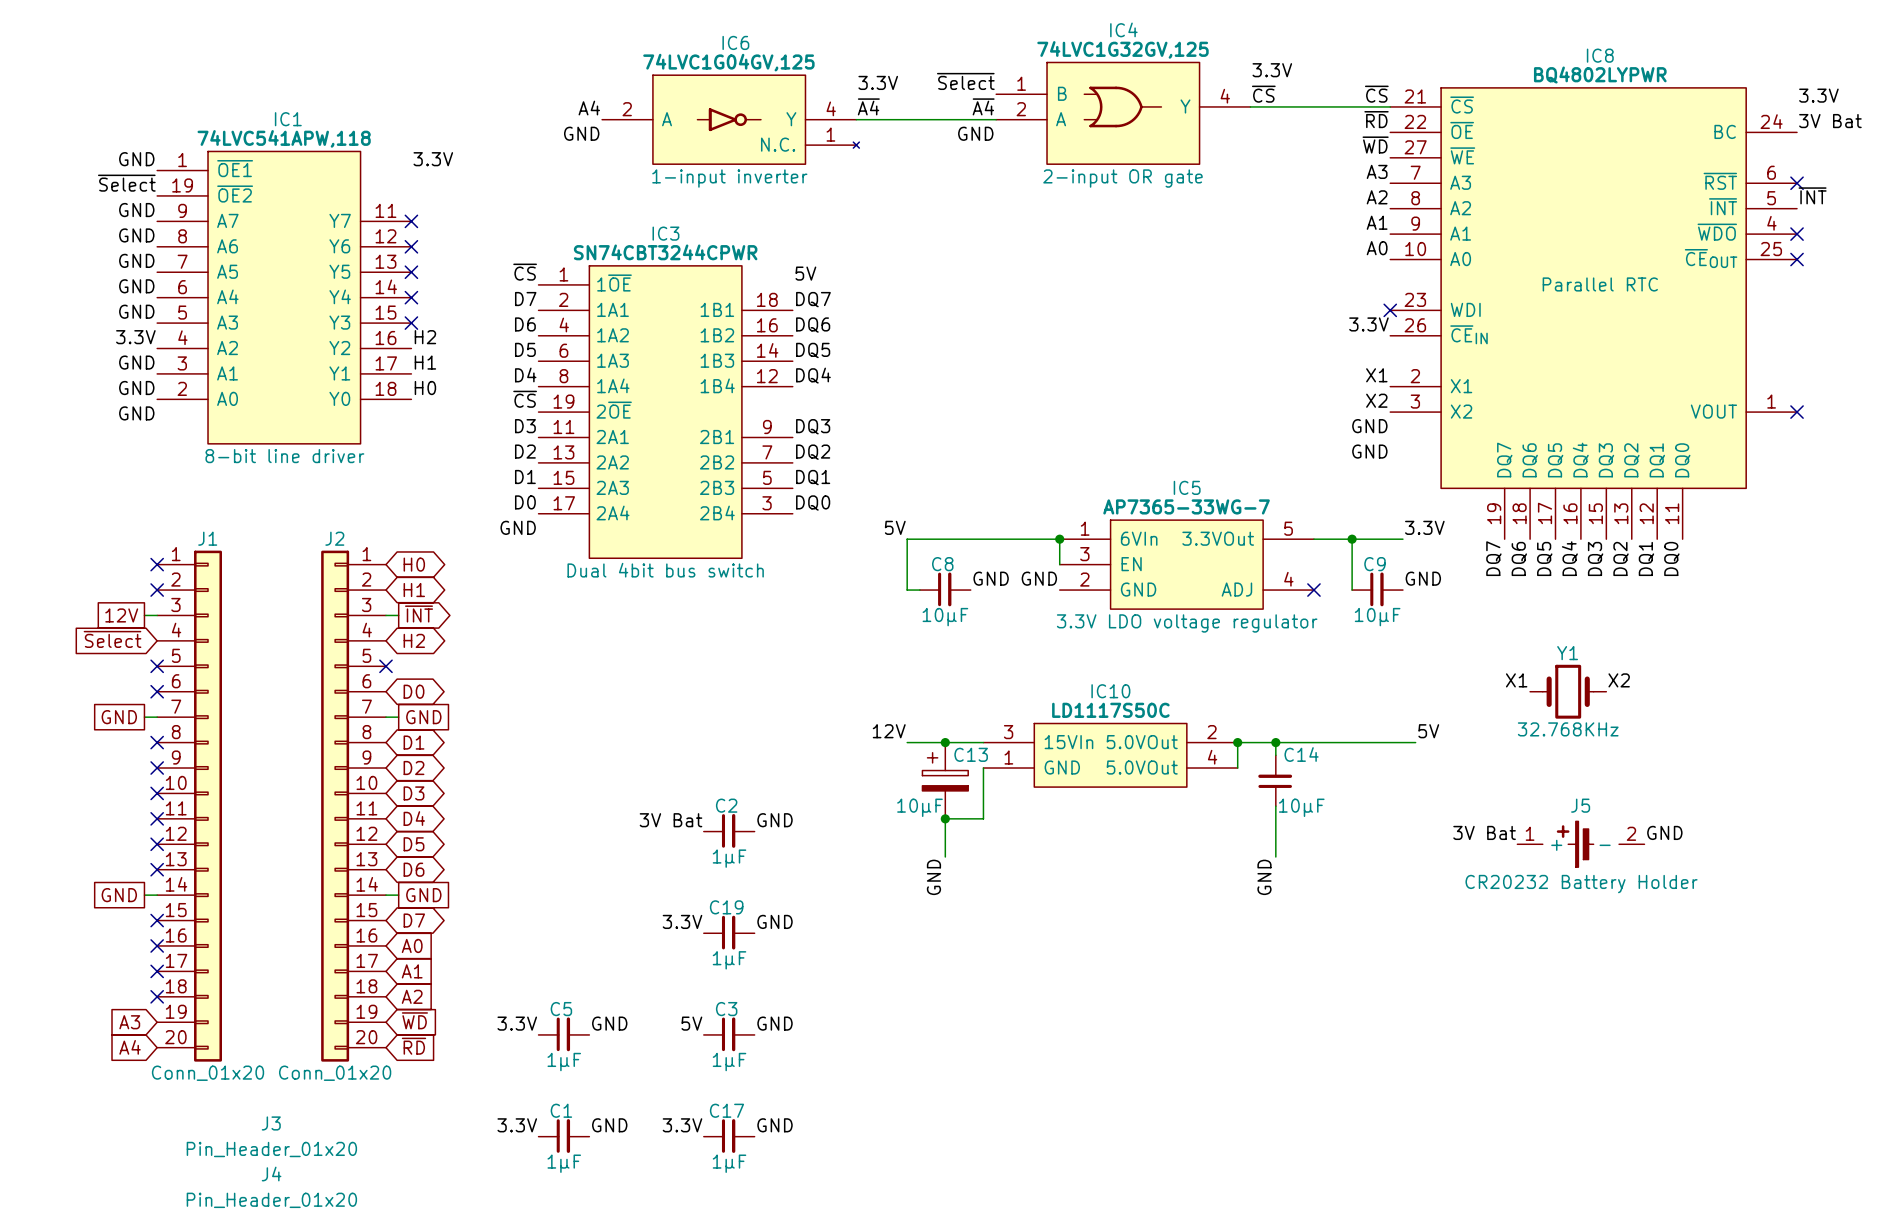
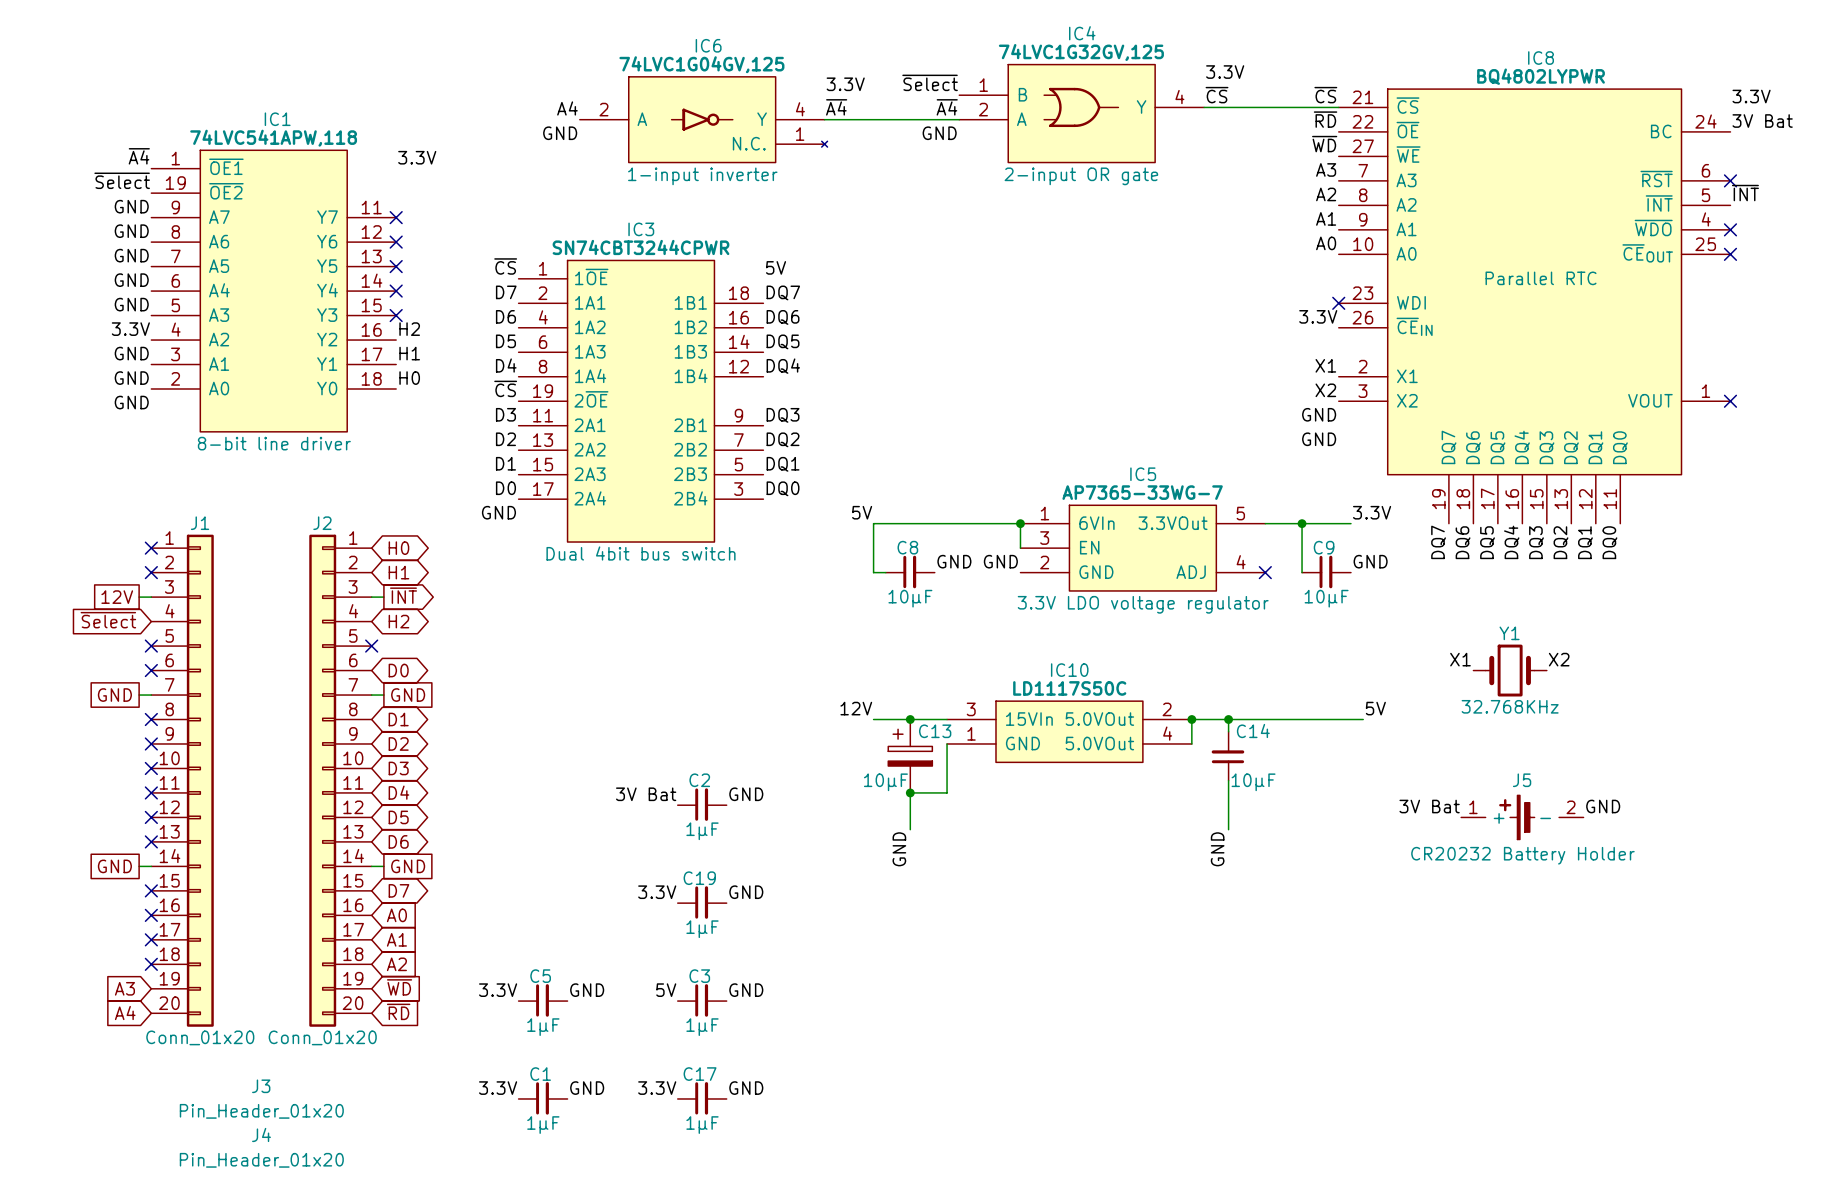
label: GND (136, 159) -> ~{A4} (139, 156)

